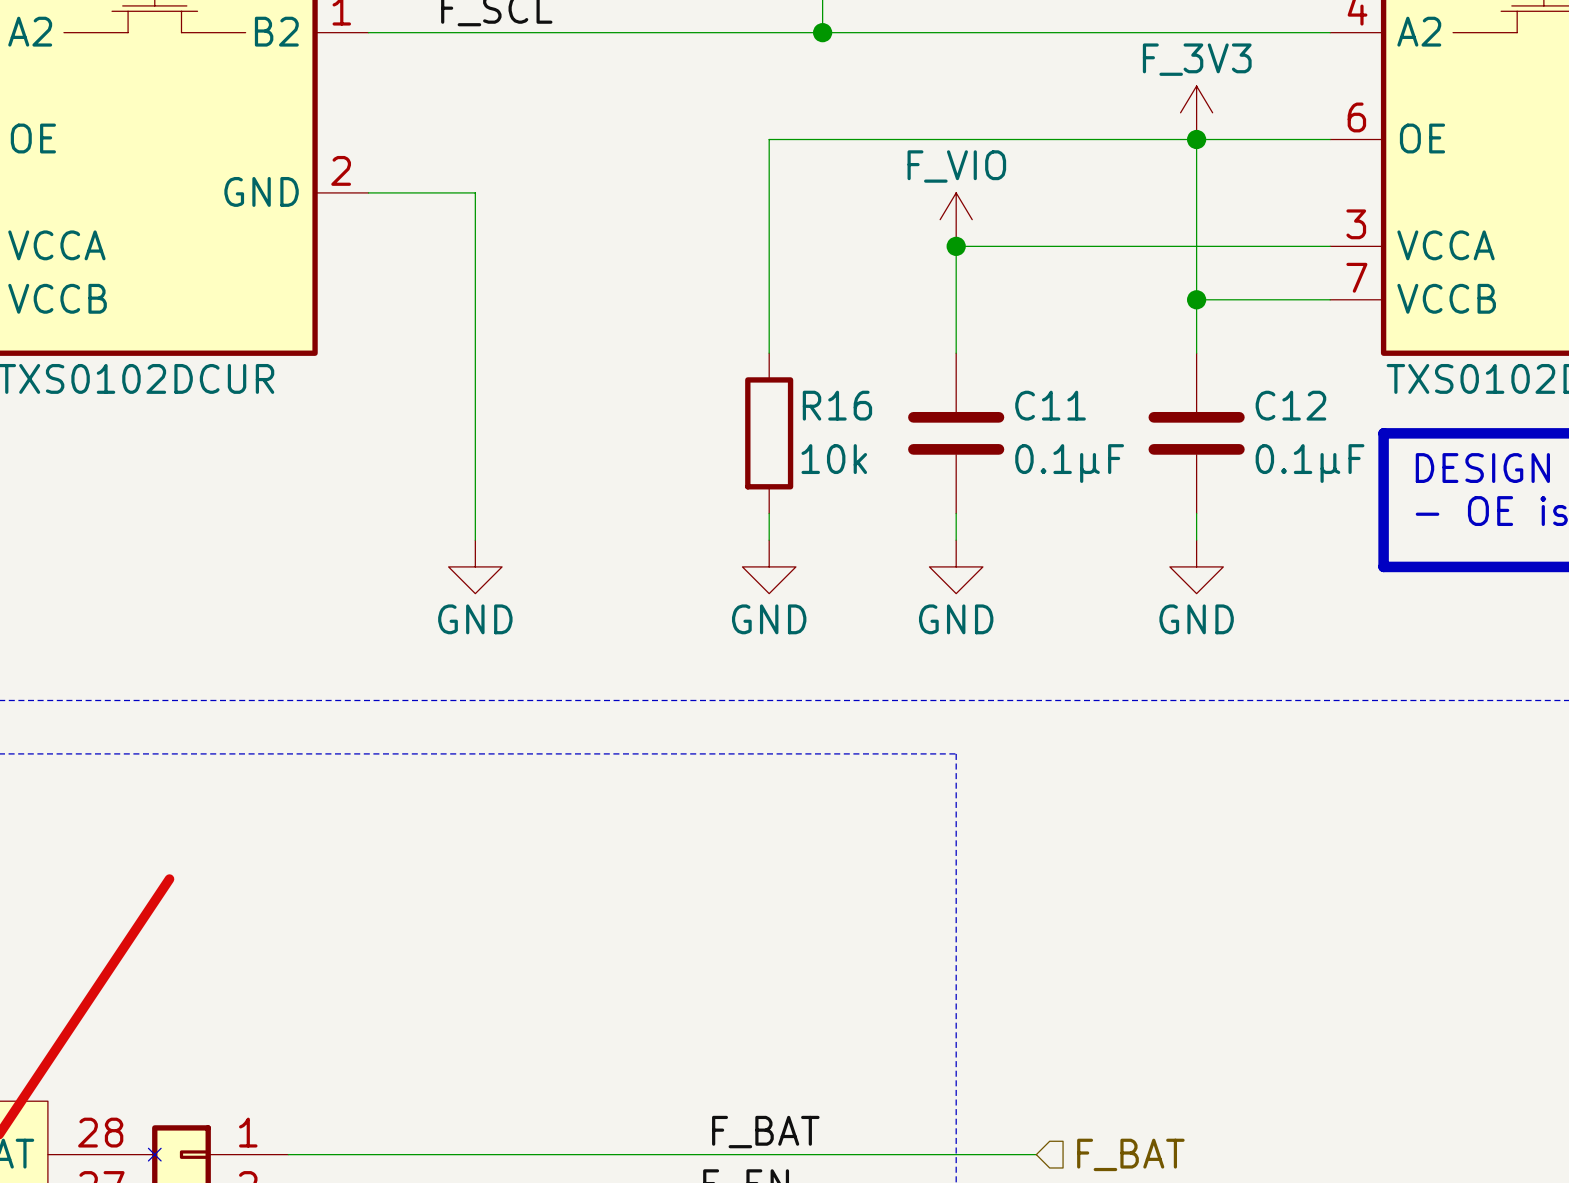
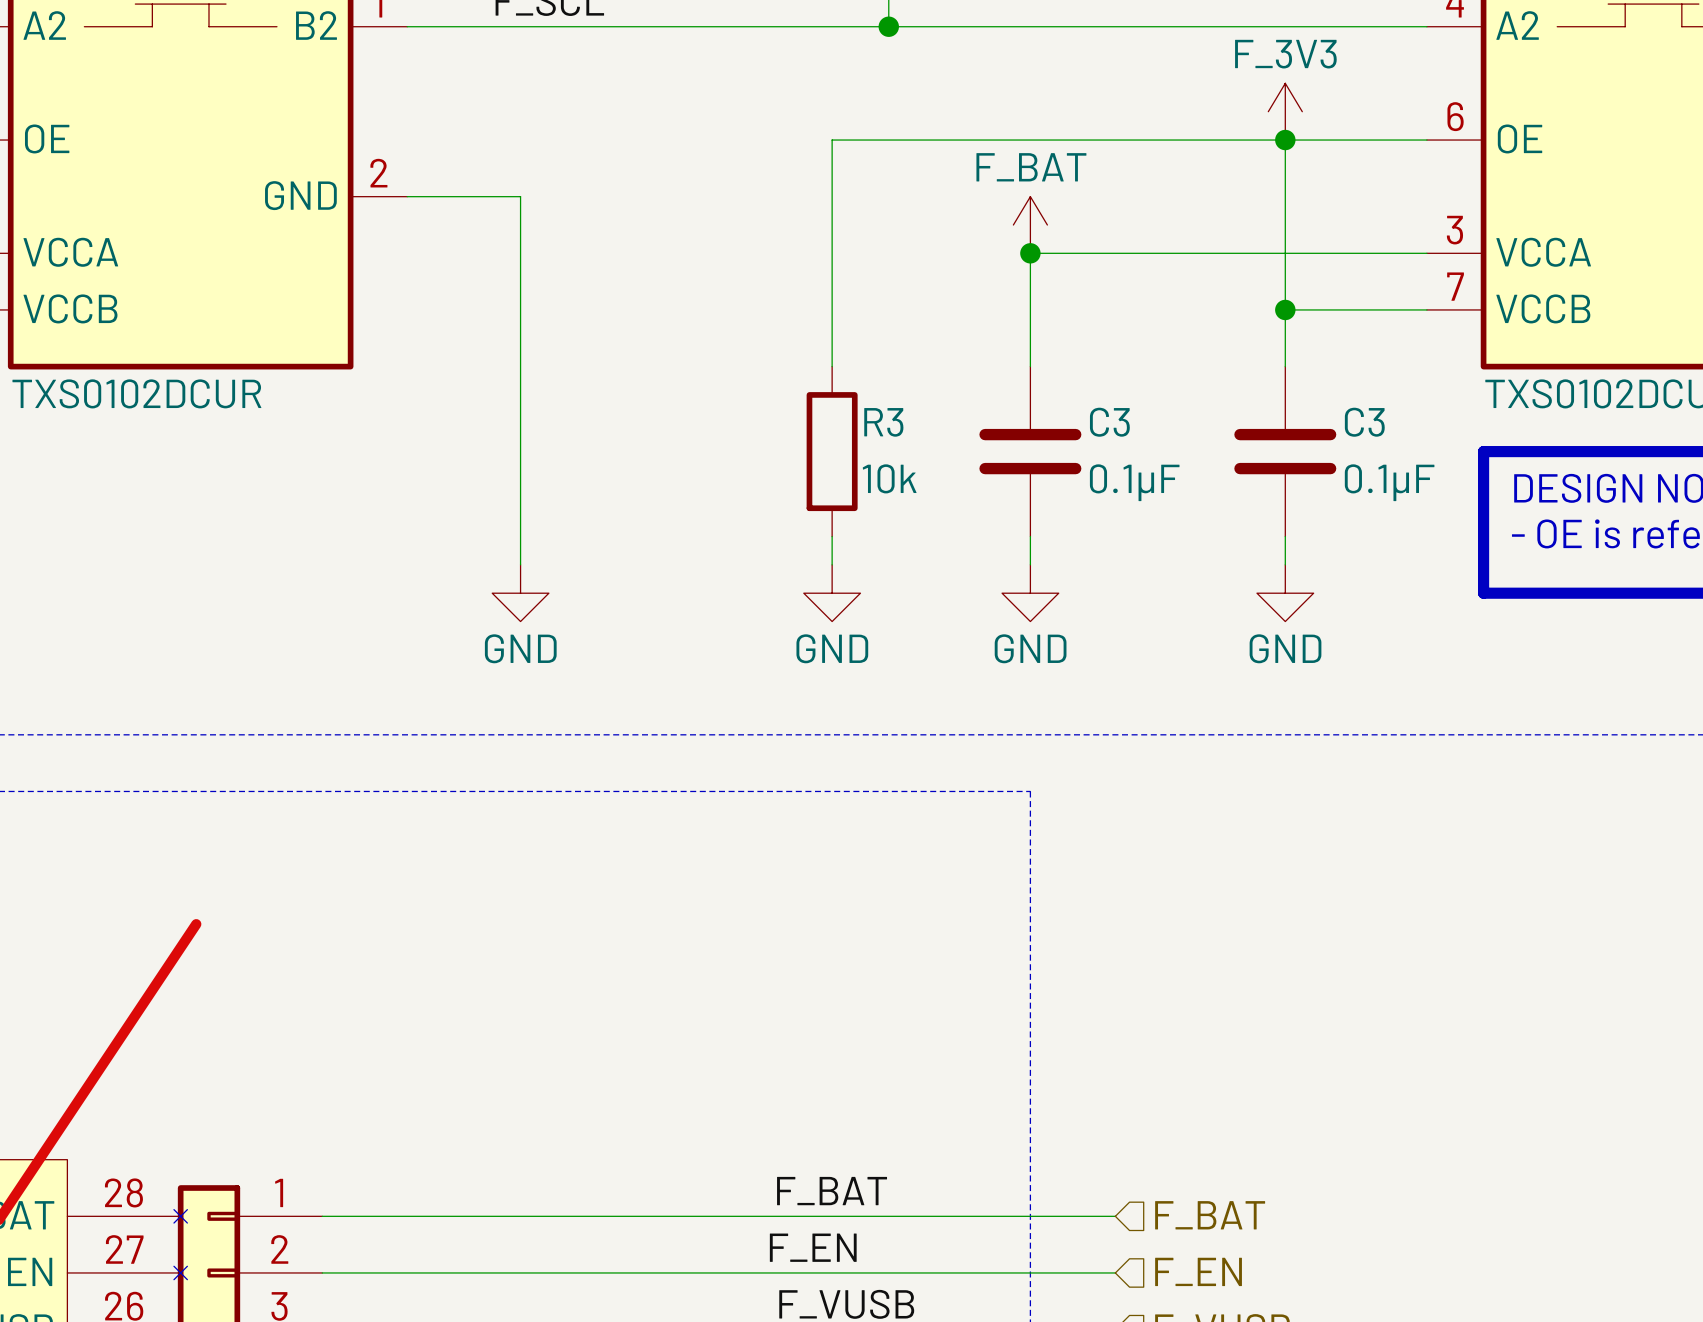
power symbol: F_VIO (956, 219) -> F_BAT (1030, 224)
R16 name: R16 (837, 405) -> R3 (883, 422)
C11 name: C11 (1050, 405) -> C3 (1109, 422)
C12 name: C12 (1290, 405) -> C3 (1364, 422)

